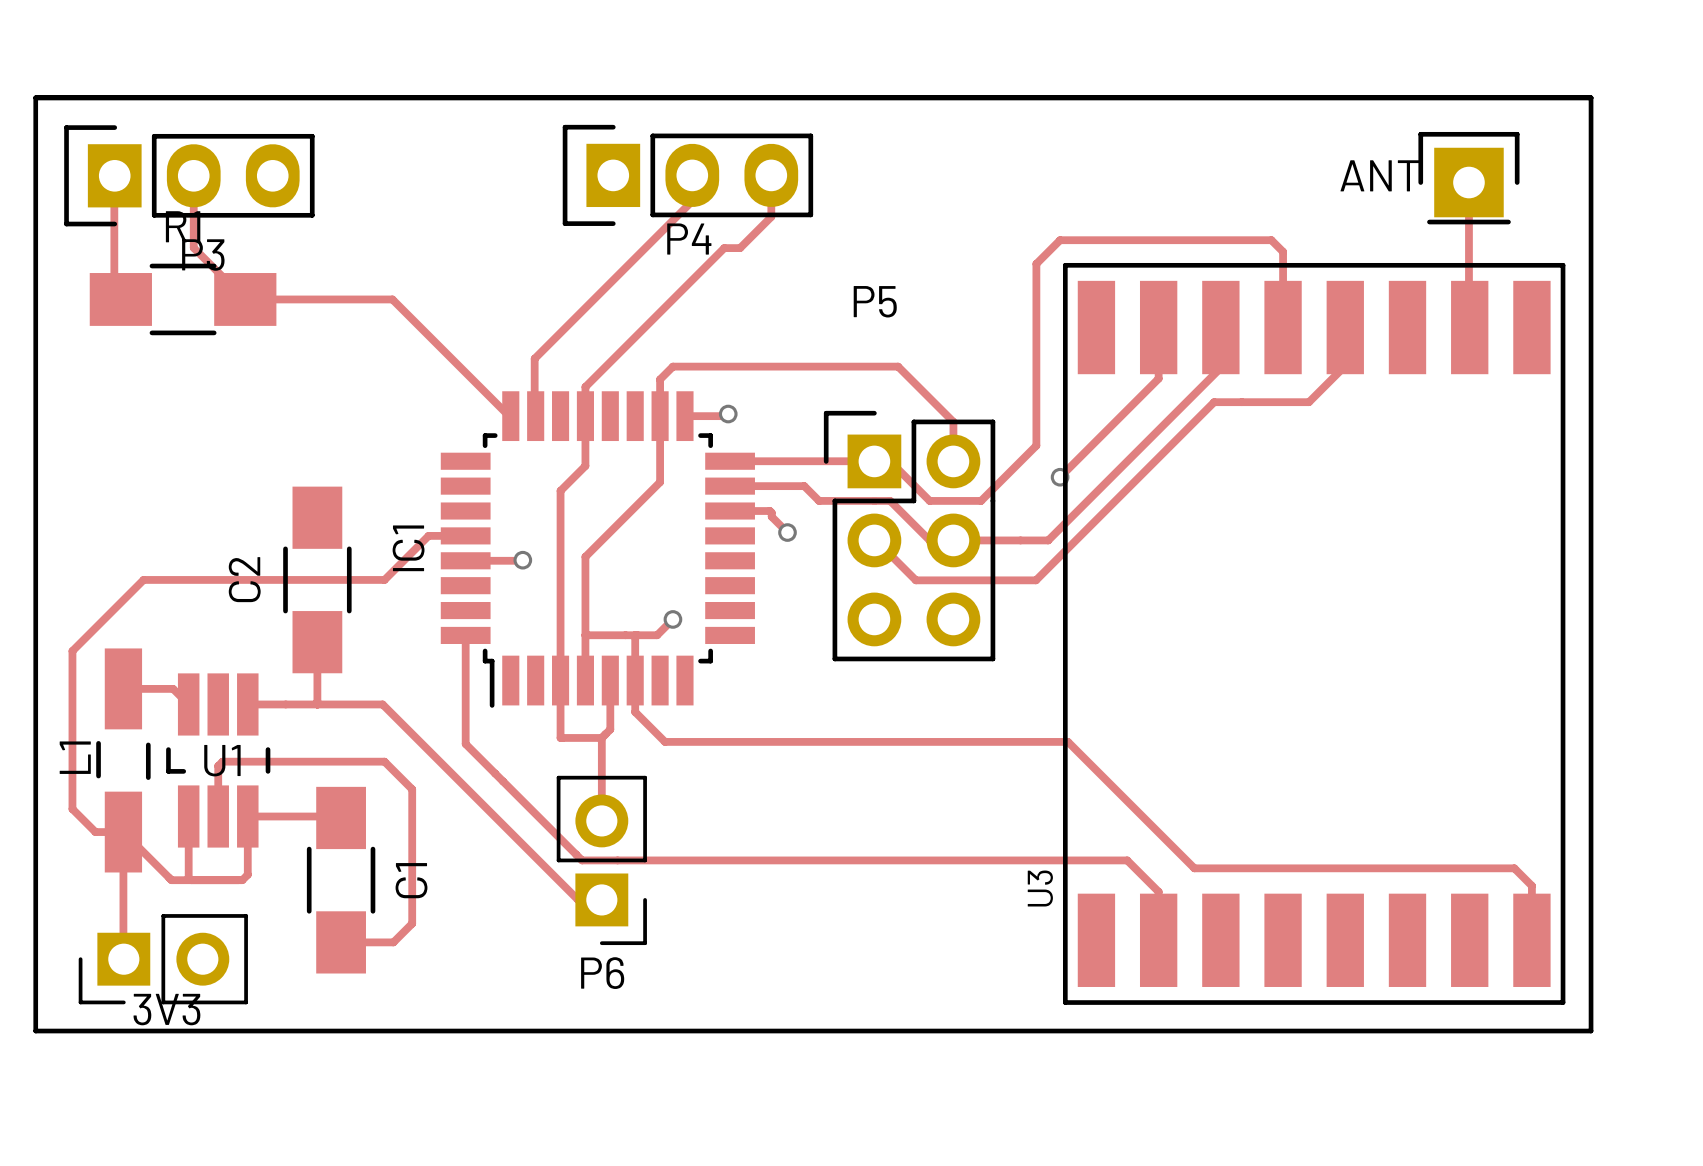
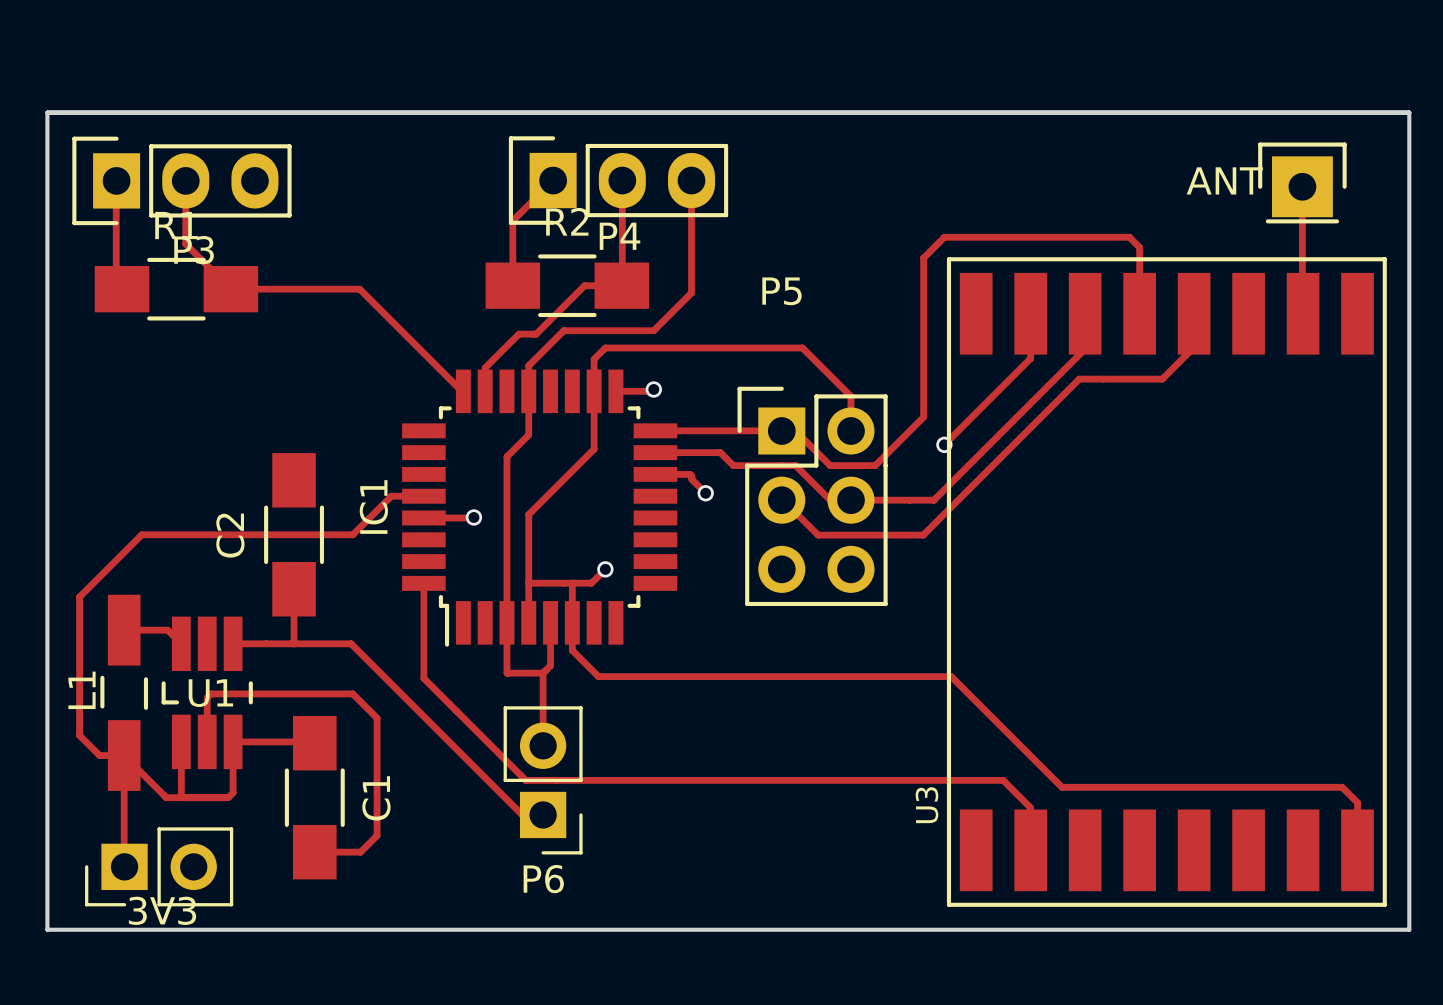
track: none -> (553, 180) (512, 220) (512, 285)
track: (692, 201) (534, 358) (534, 415) -> (622, 203) (622, 285) (584, 285) (536, 334) (518, 334) (485, 367) (485, 391)
track: (771, 216) (740, 248) (724, 248) (625, 346) -> (691, 216) (691, 292) (653, 330) (563, 330)
R2: none -> (567, 285)

